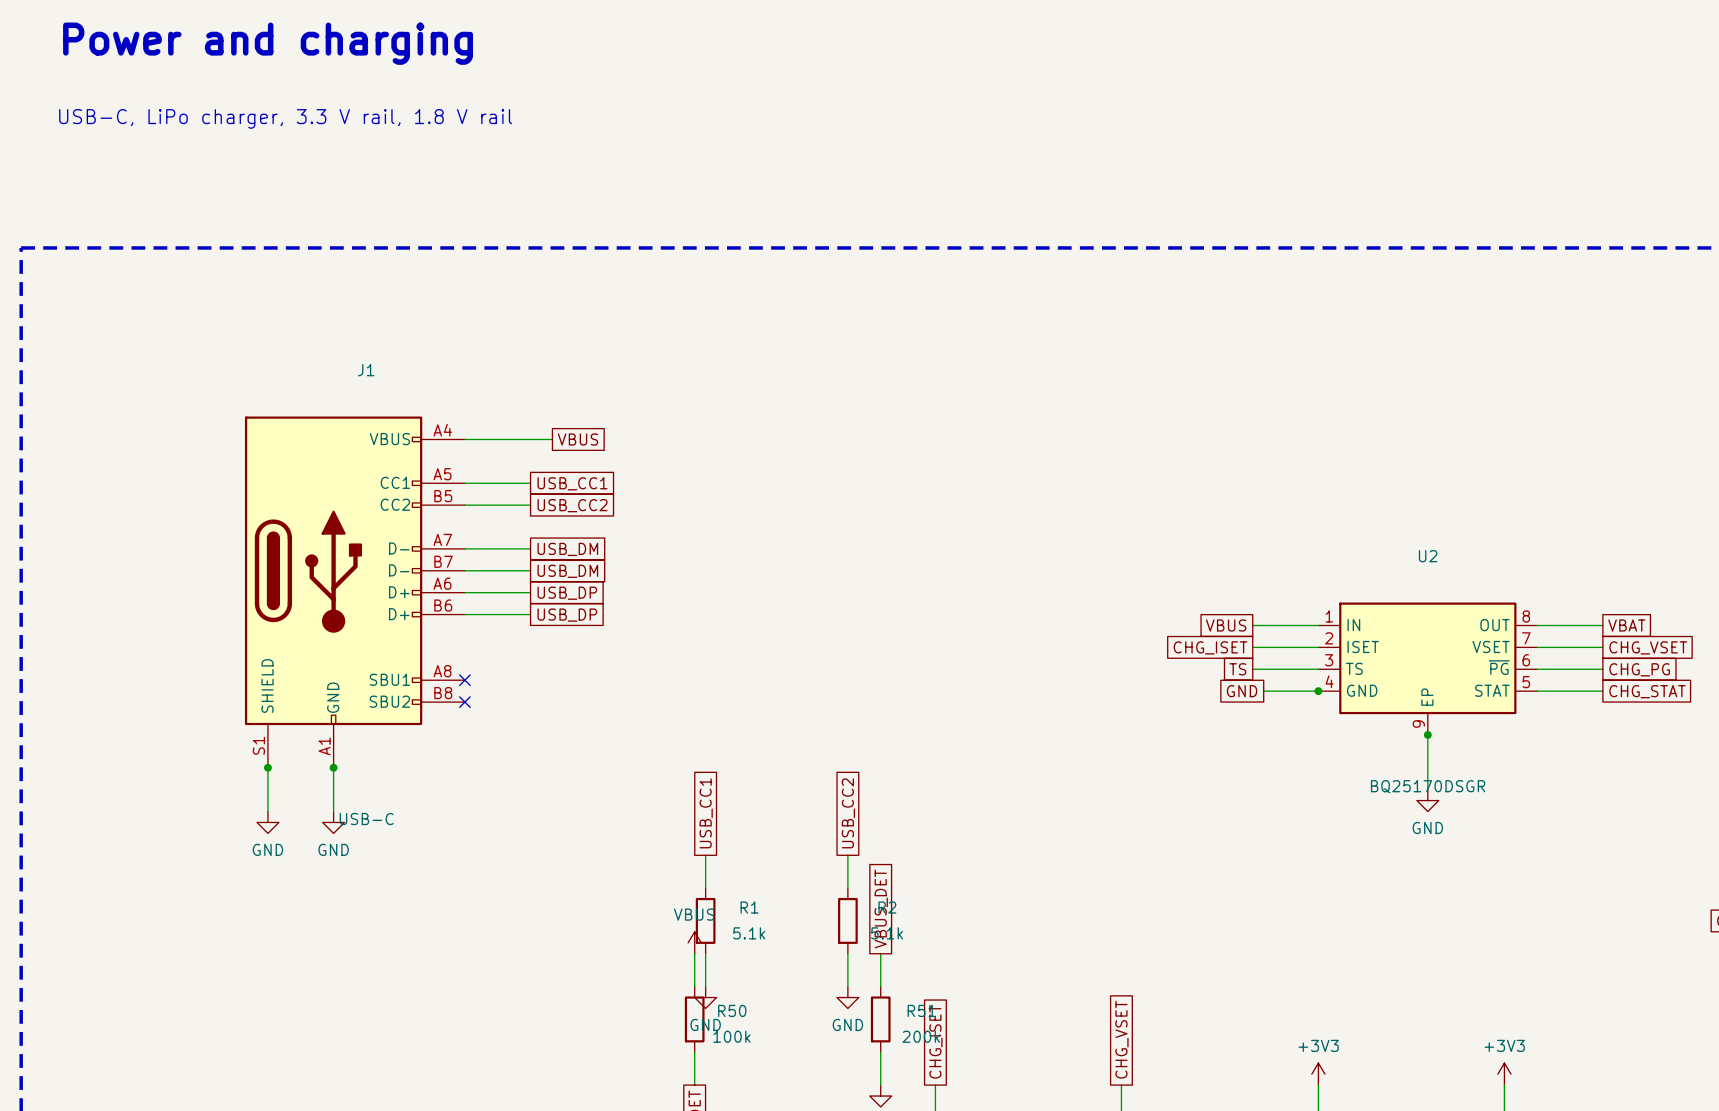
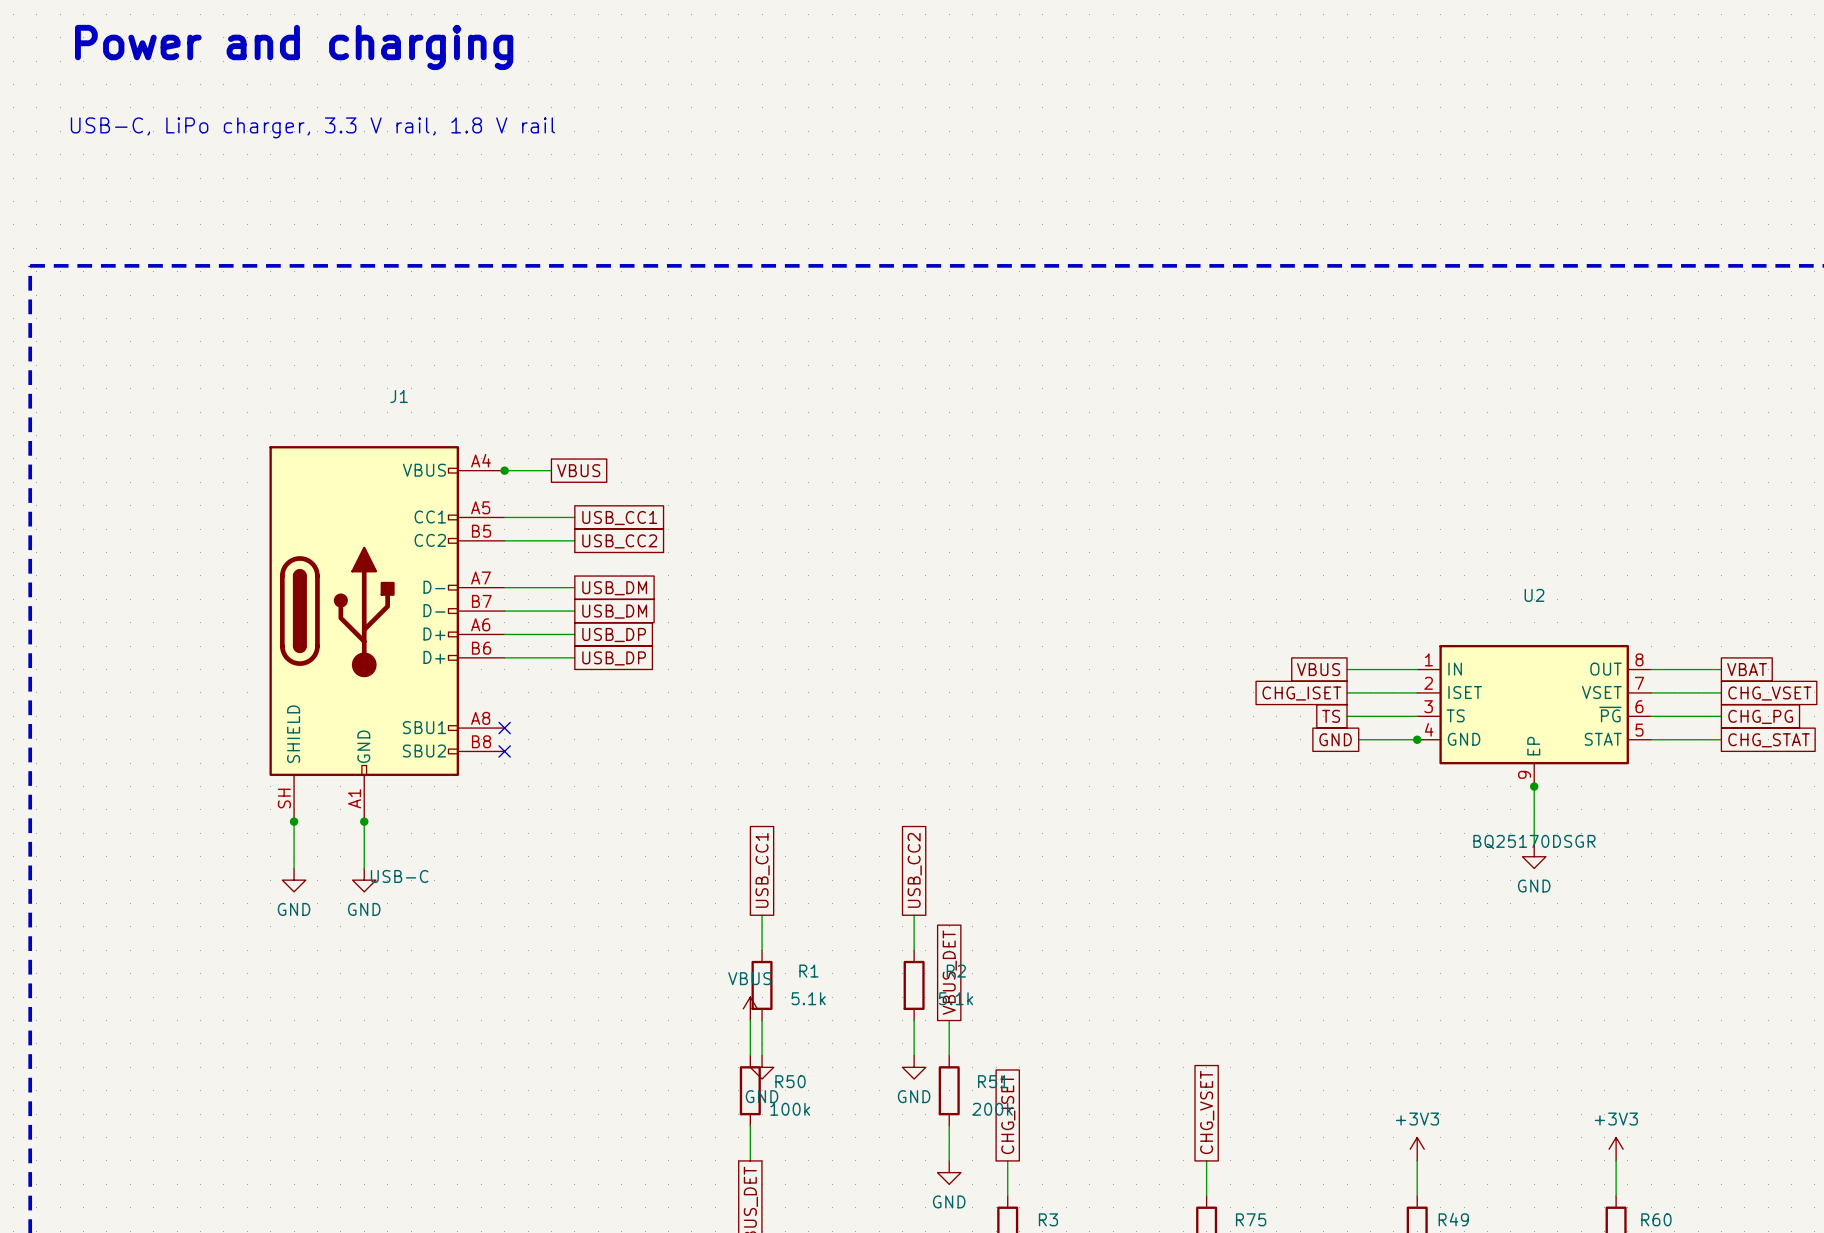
junction: none -> (504, 470)
wire: (508, 439) (552, 439) -> none
global label position: VBUS (577, 439) -> VBUS (578, 470)
J1 pin number: S1 (258, 745) -> SH (284, 798)

